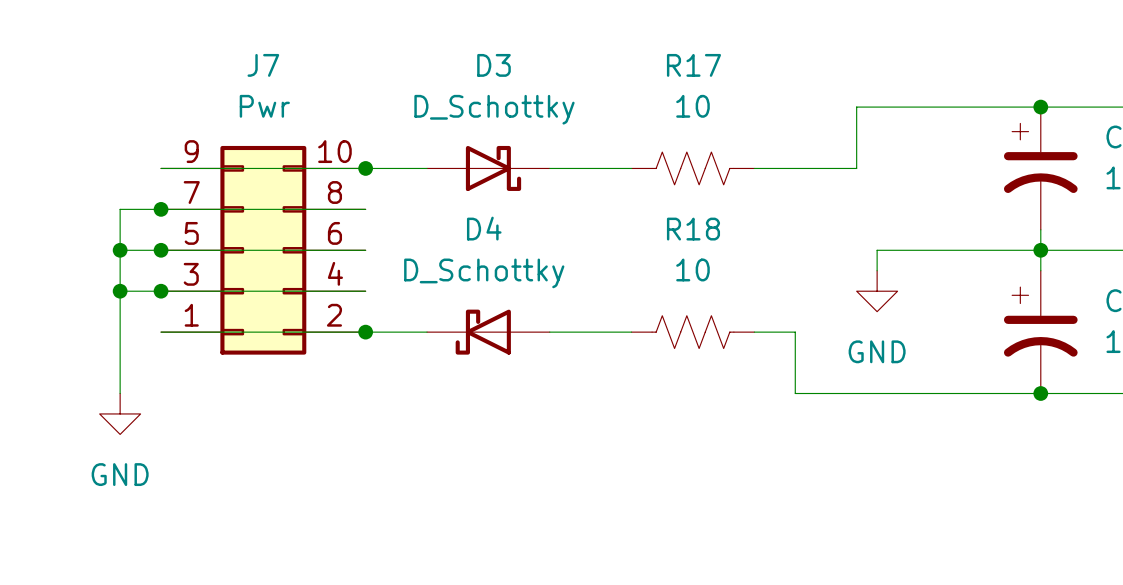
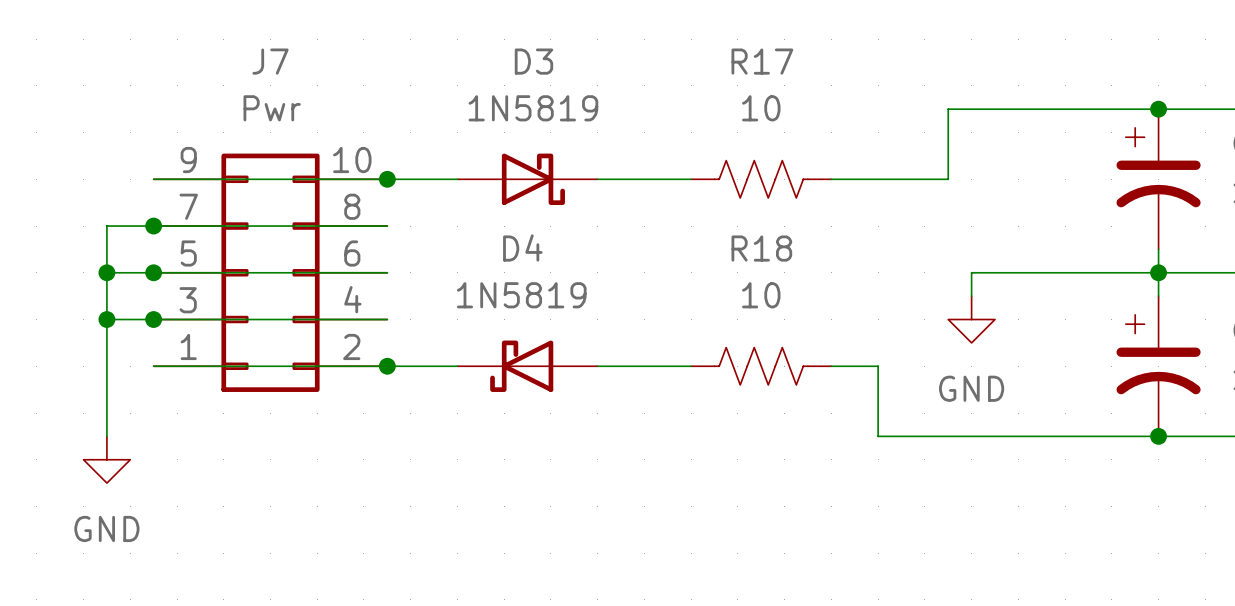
D3 value: D_Schottky (494, 109) -> 1N5819 (533, 108)
D4 value: D_Schottky (484, 273) -> 1N5819 (521, 295)

